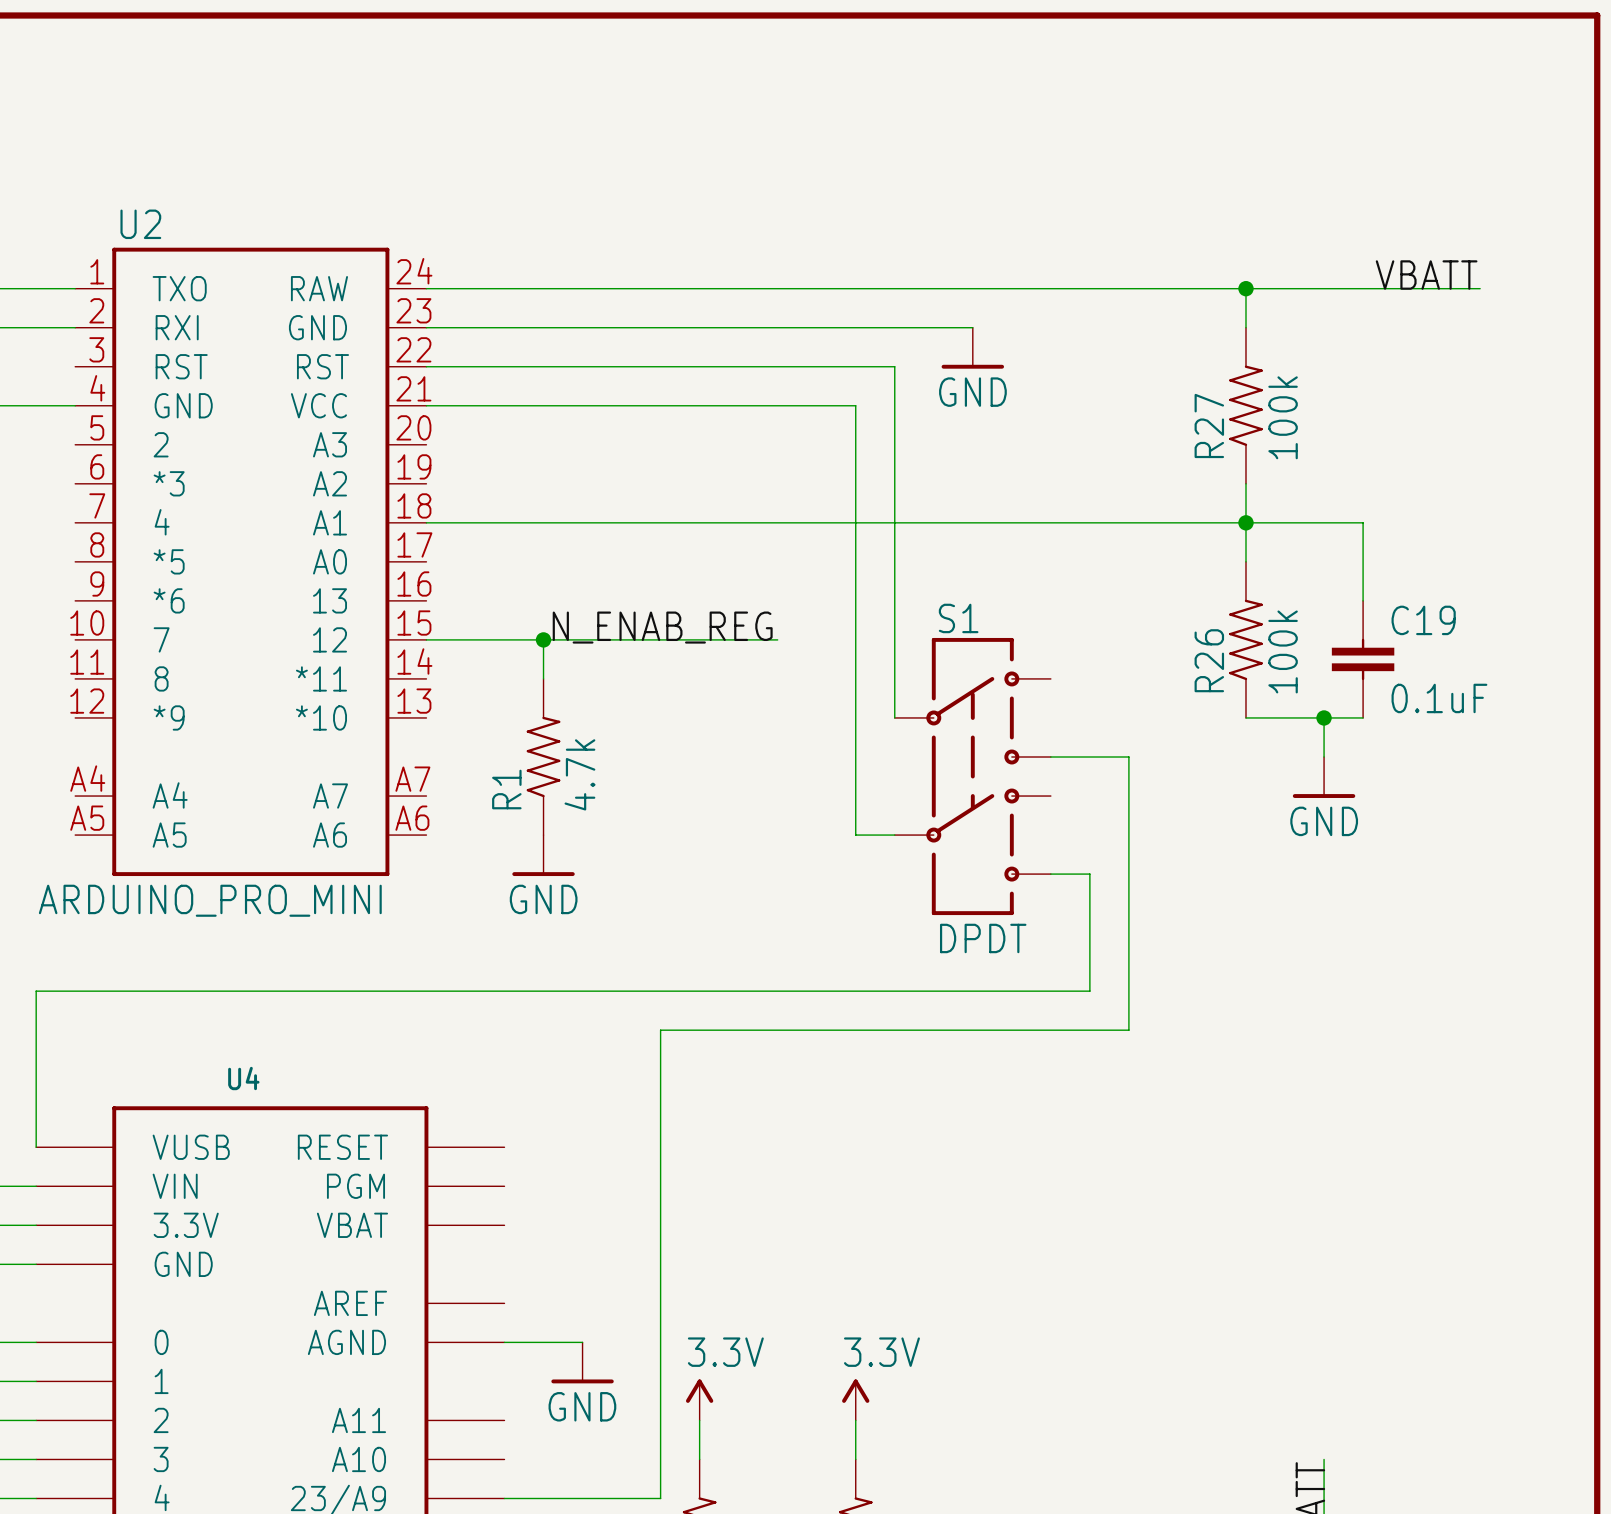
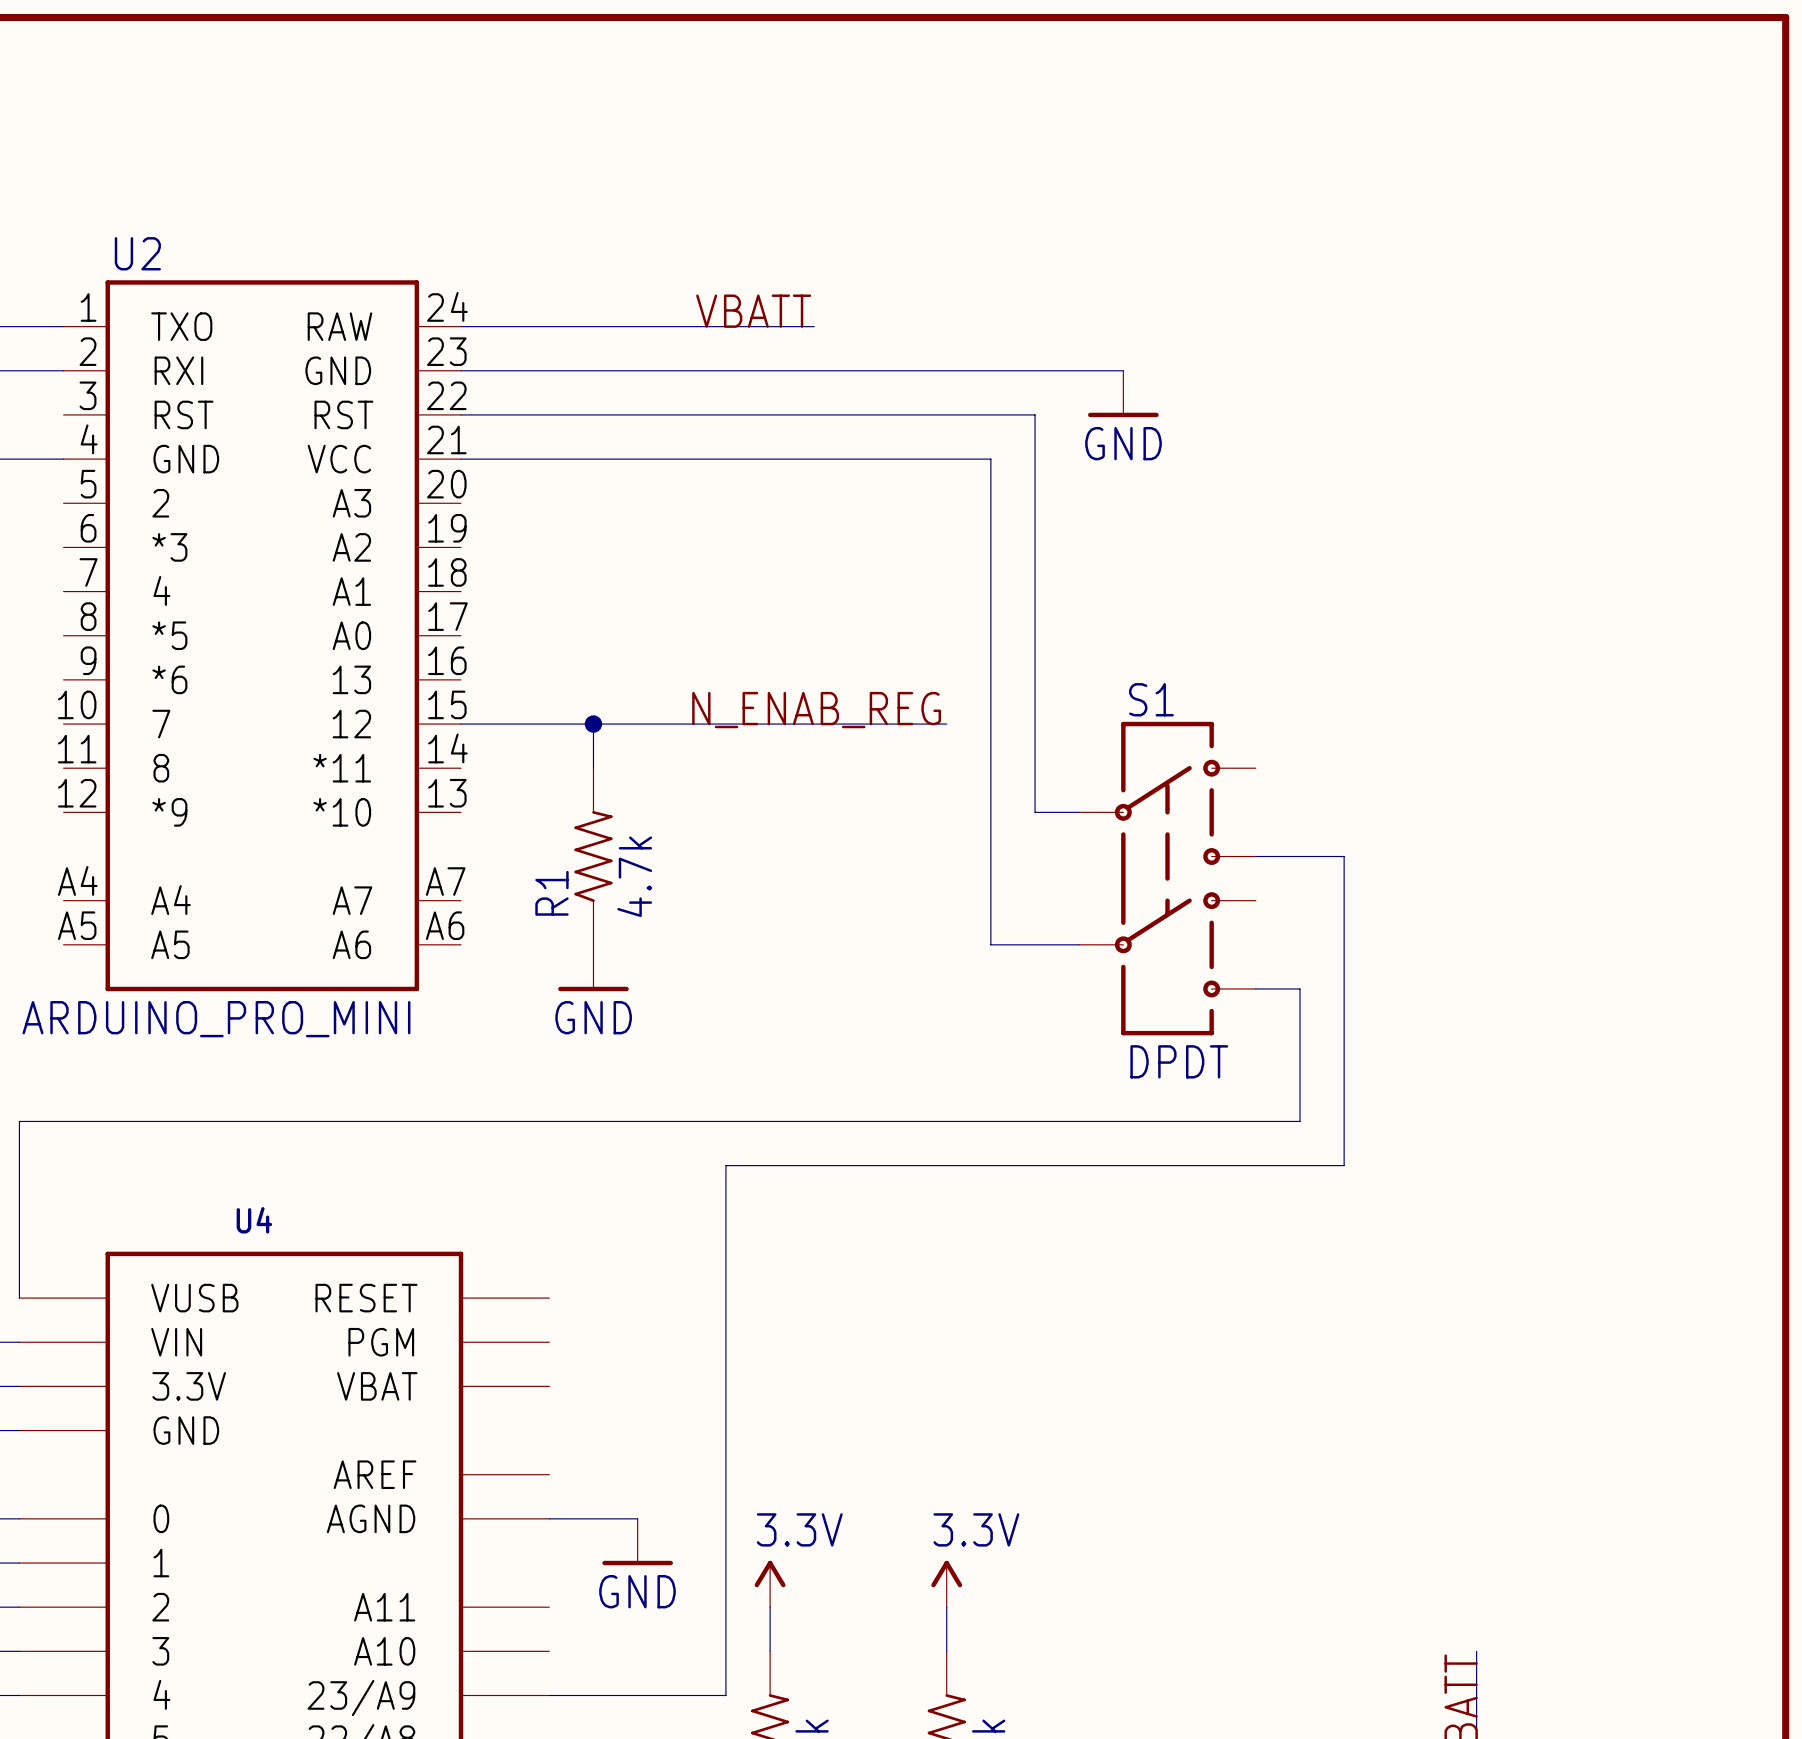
label: none -> VBATT (753, 311)
label: VBATT (1426, 275) -> none
wire: (738, 288) (1480, 288) -> none
wire: (1245, 288) (1245, 327) -> none
junction: (1245, 288) -> none
wire: none -> (1079, 370) (1123, 370)
power symbol position: GND (972, 348) -> GND (1123, 393)
wire: (894, 366) (894, 405) -> (946, 459) (990, 459)
wire: none -> (990, 414) (1035, 414) (1035, 812) (1079, 812)
wire: (855, 405) (855, 835) (894, 835) -> none
R27: 100k (1245, 405) -> none
wire: (1245, 483) (1245, 561) -> none
wire: (426, 522) (1363, 522) (1363, 600) -> none
junction: (1245, 522) -> none
label position: N_ENAB_REG (662, 627) -> N_ENAB_REG (816, 710)
wire: none -> (858, 724) (946, 724)
R26: 100k (1245, 639) -> none
C19: 0.1uF (1363, 659) -> none
wire: none -> (990, 812) (990, 944) (1079, 944)
wire: (1245, 717) (1363, 717) -> none
wire: (1324, 717) (1324, 757) -> none
junction: (1324, 717) -> none
wire: (1050, 757) (1128, 757) (1128, 1030) -> (1255, 856) (1344, 856) (1344, 1165) (1255, 1165)
S1 position: (972, 776) -> (1167, 878)
power symbol: GND (1324, 777) -> none
wire: (1050, 874) (1089, 874) (1089, 991) -> (1255, 988) (1299, 988) (1299, 1121) (1211, 1121)

